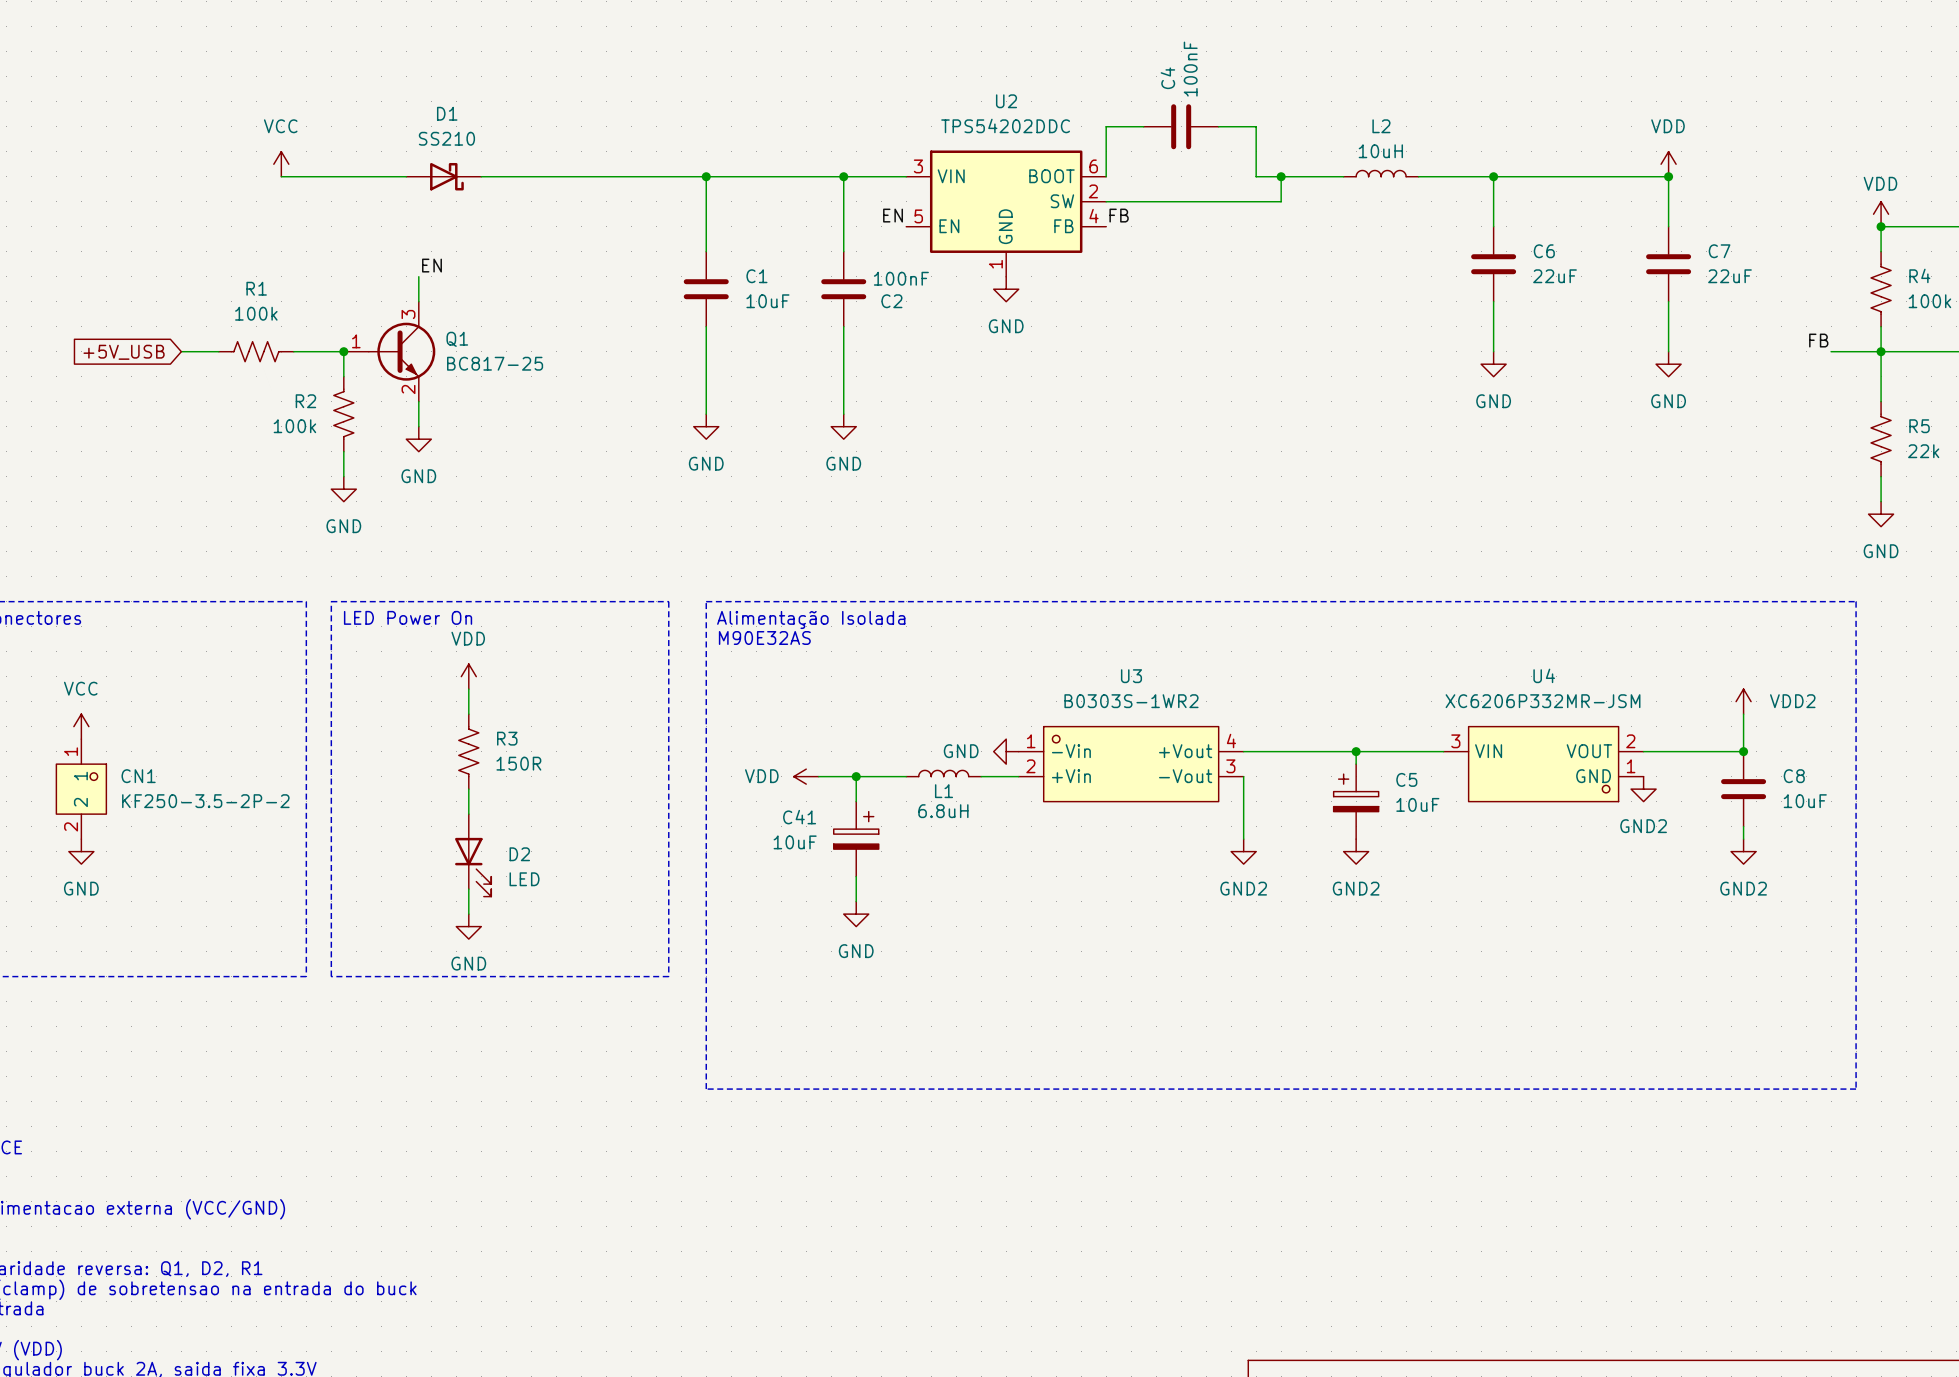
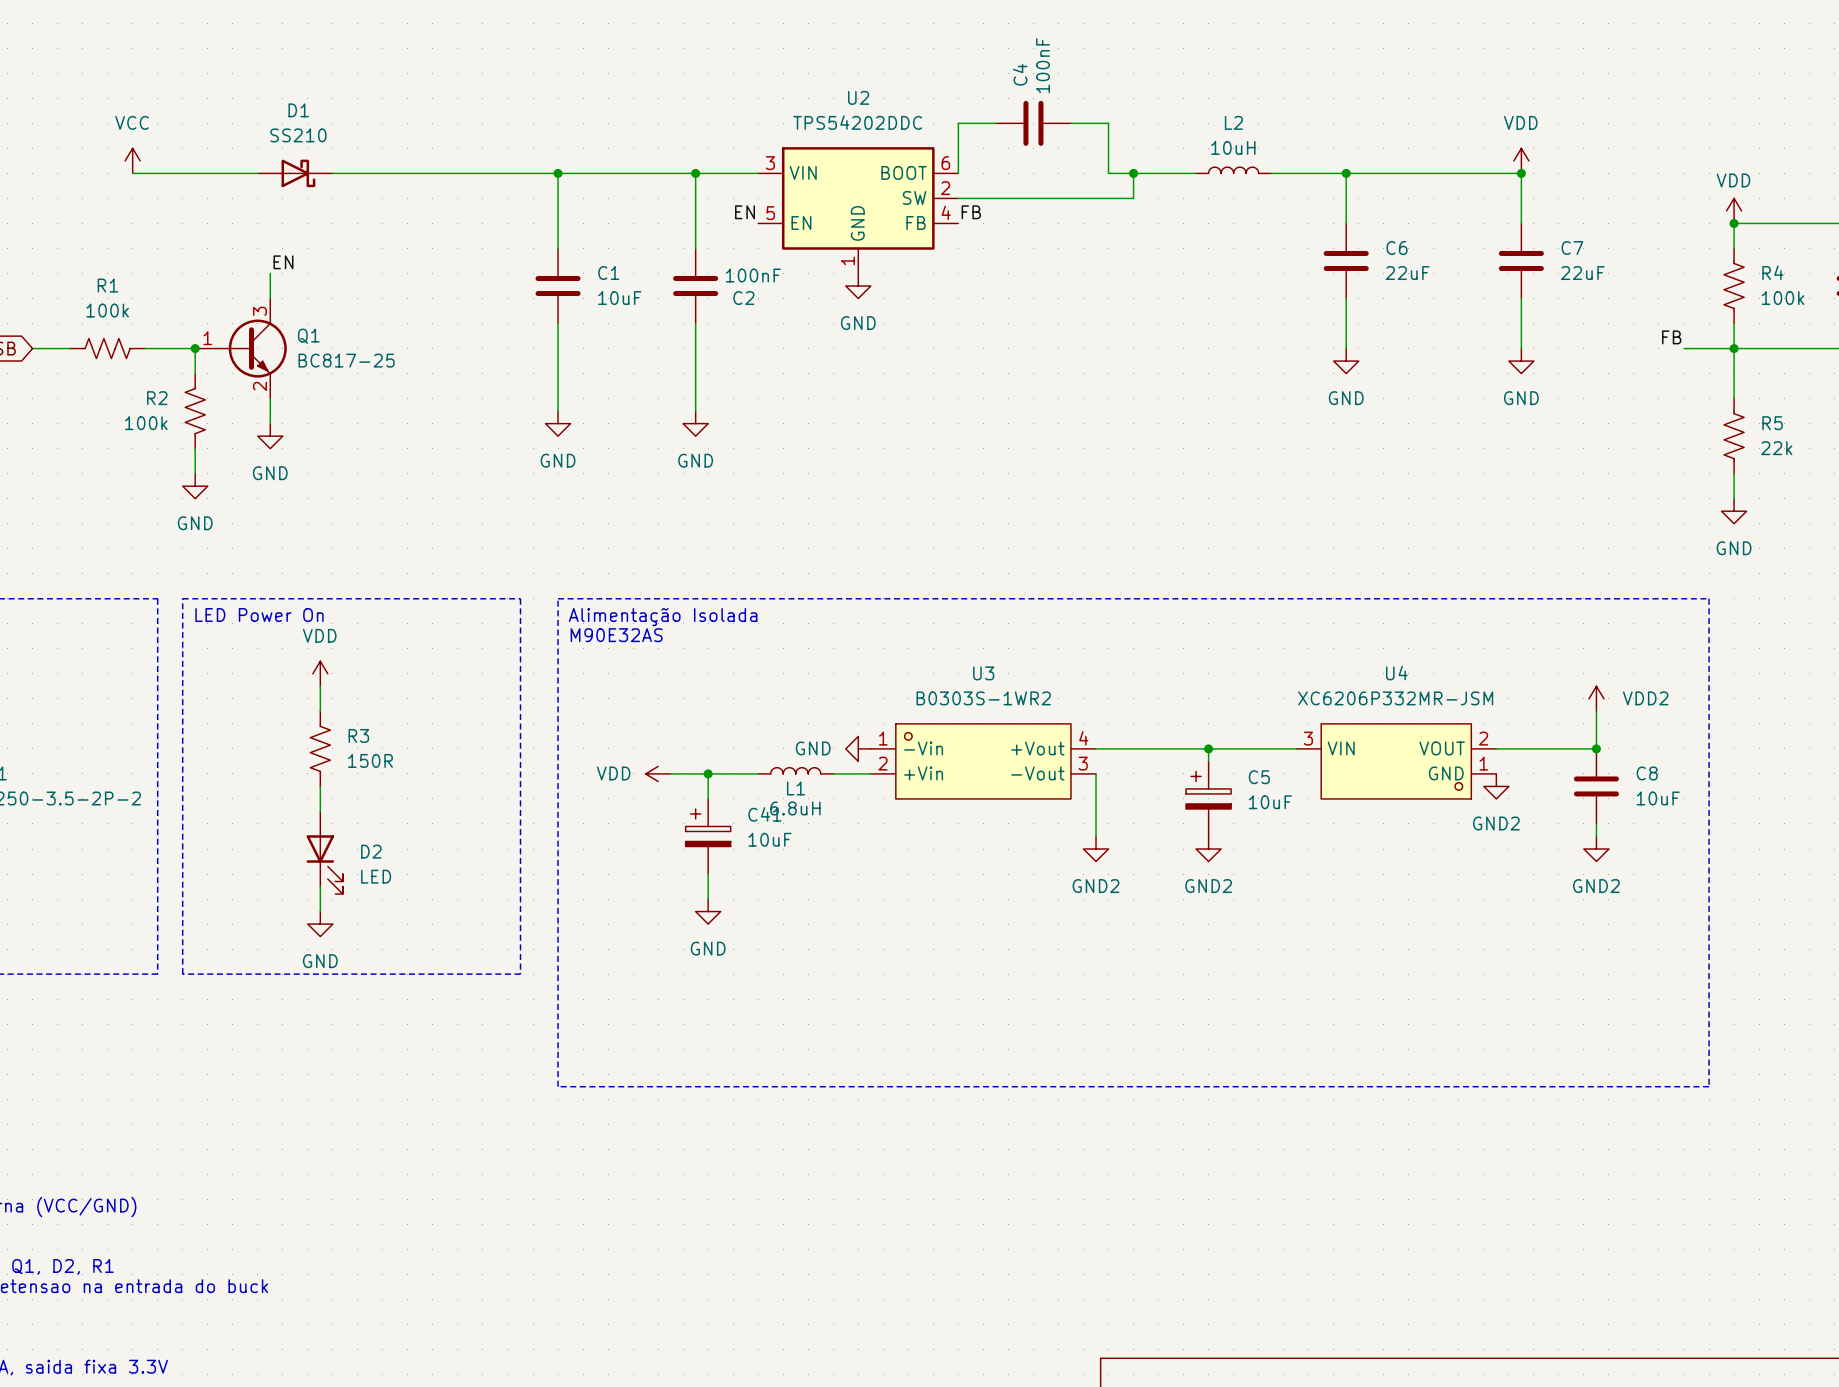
C41 flip: as is (856, 830) -> left-right (708, 827)

